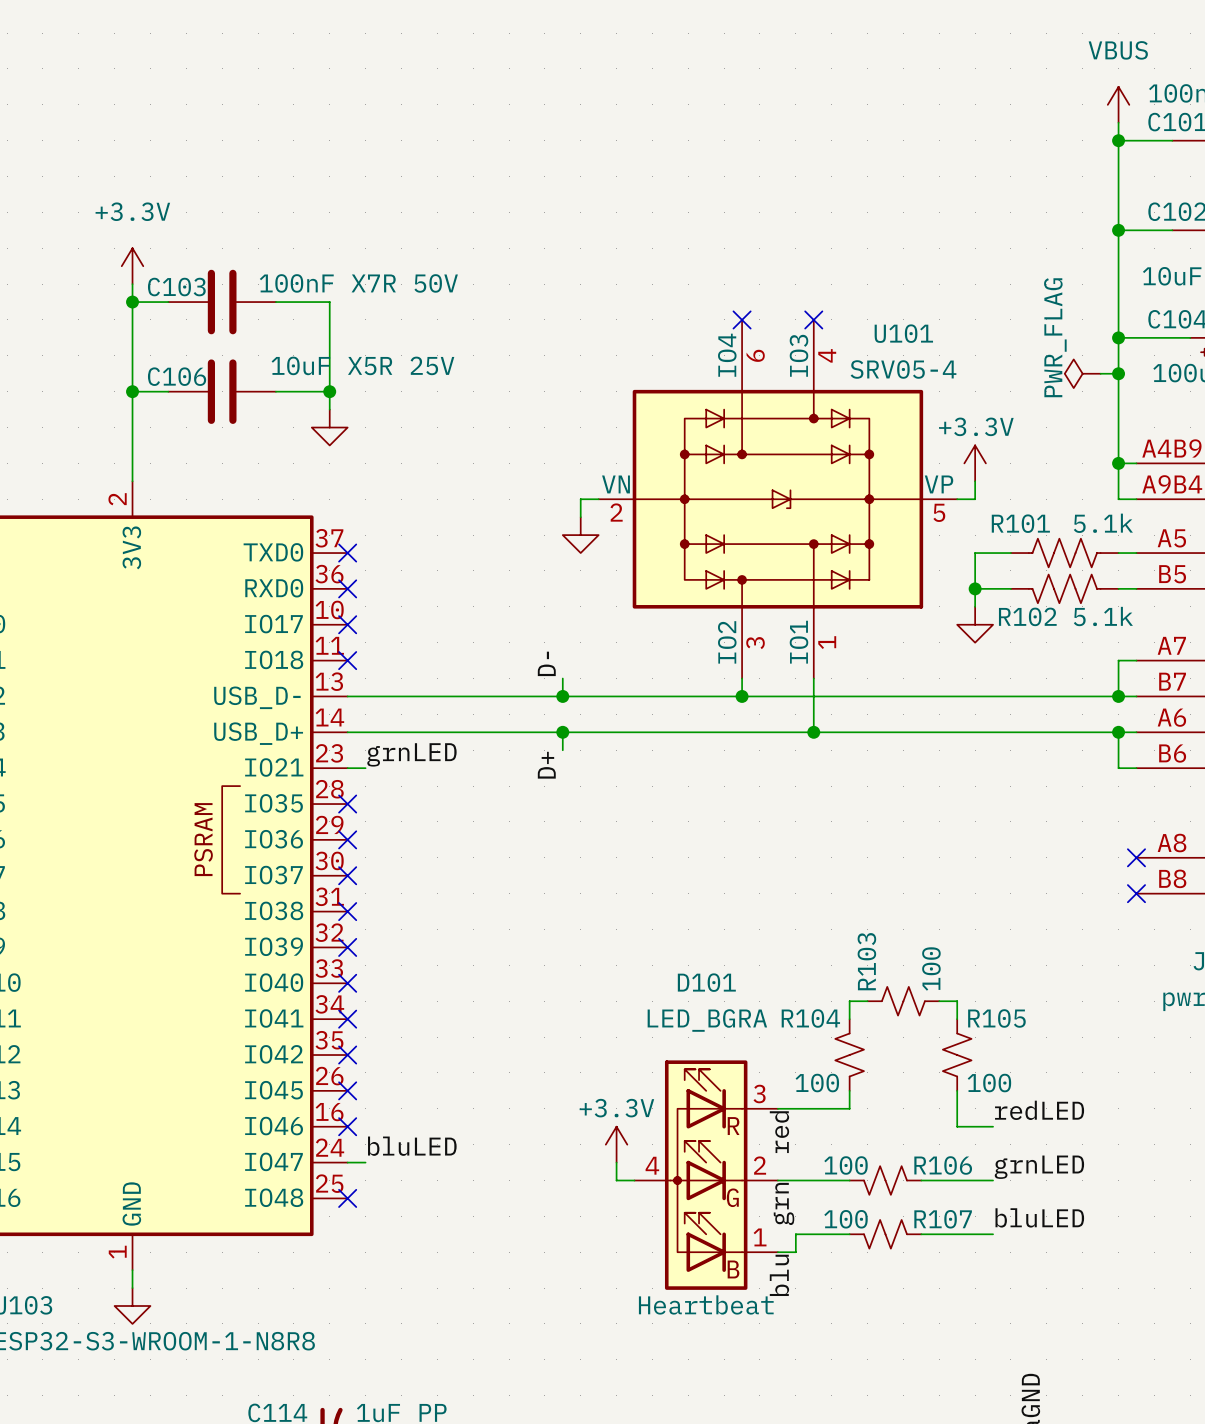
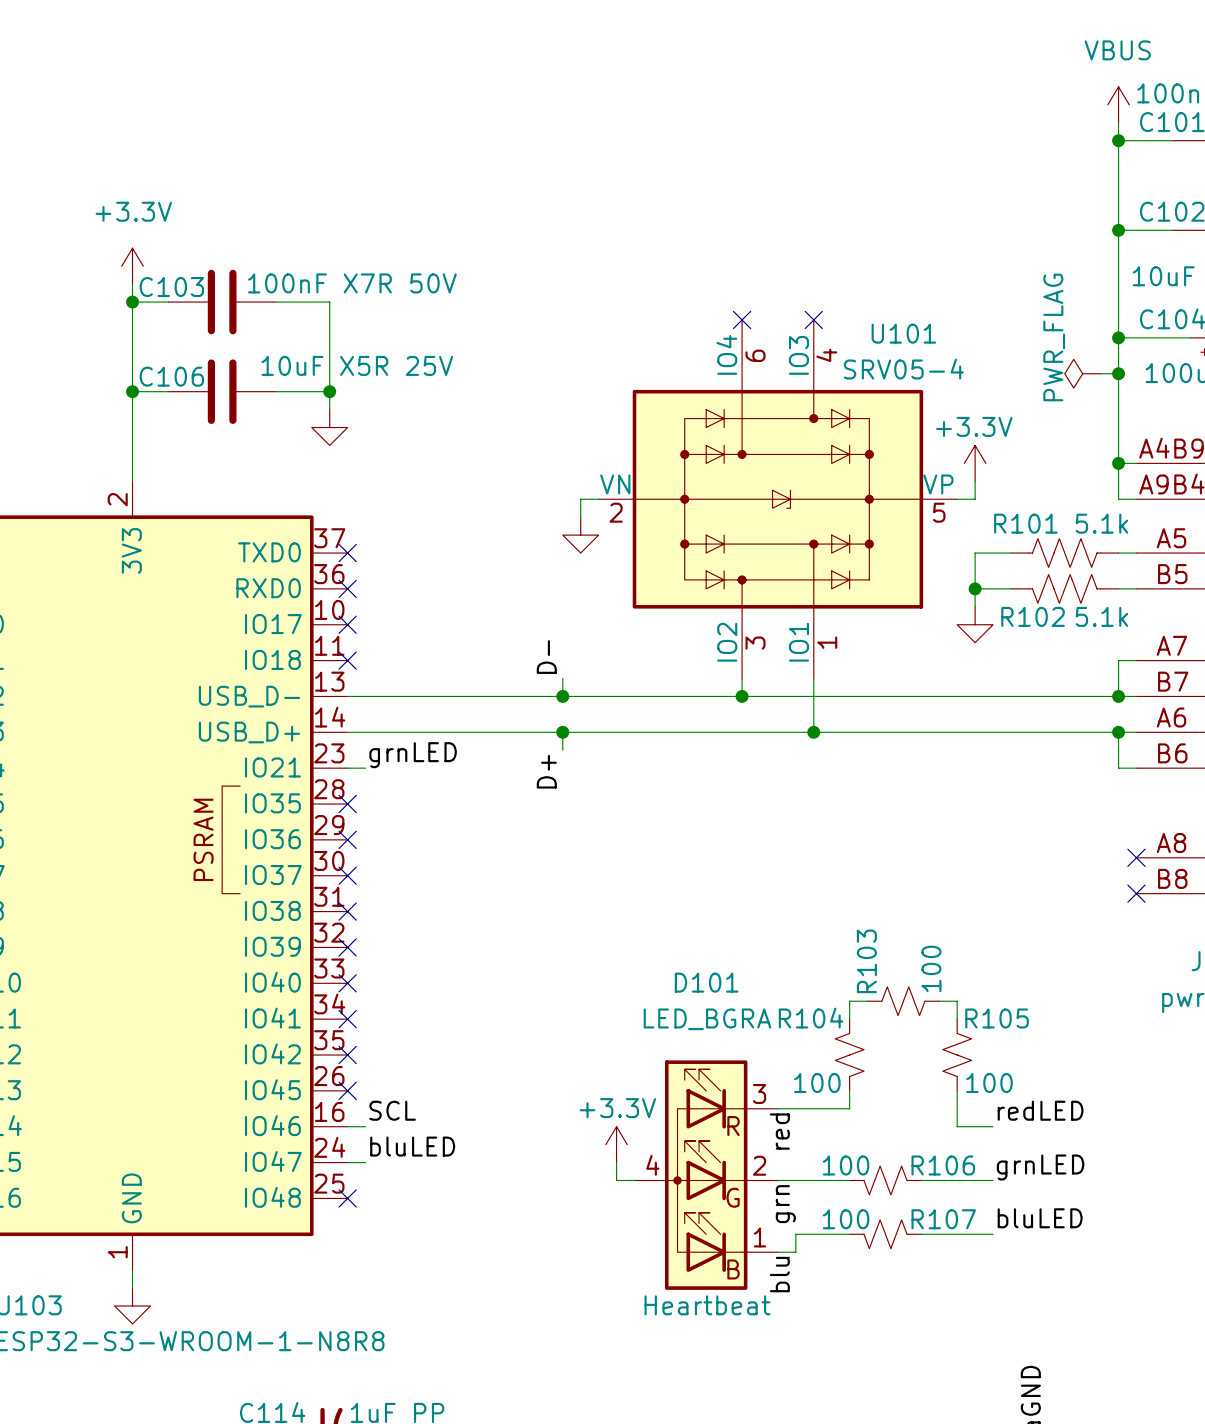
label: none -> SCL (392, 1110)
wire: none -> (347, 1126) (365, 1126)
no-connect mark: (347, 1126) -> none

